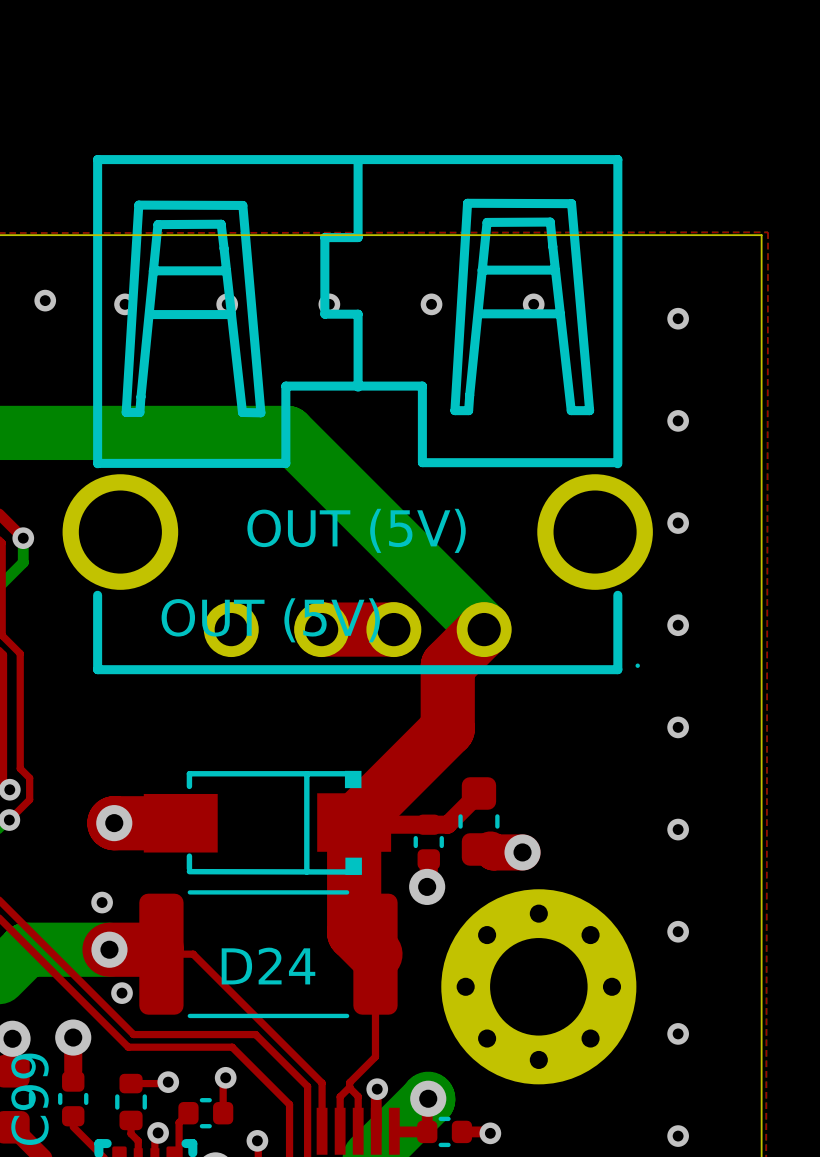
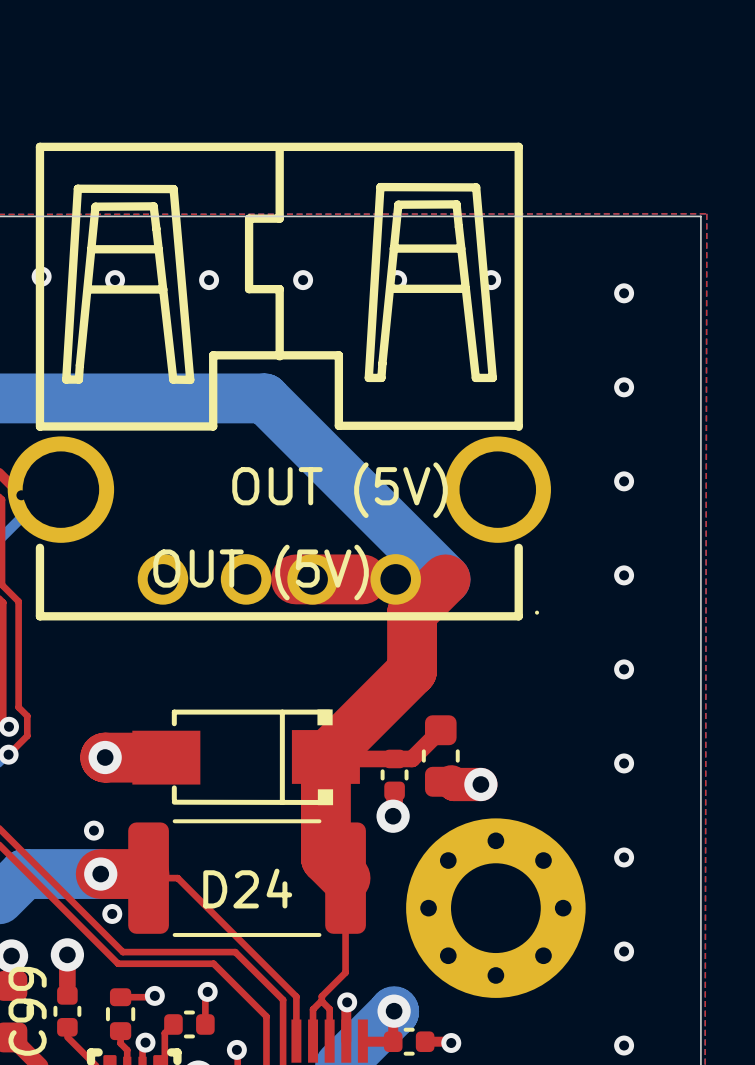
part position: (357, 414) -> (279, 381)

